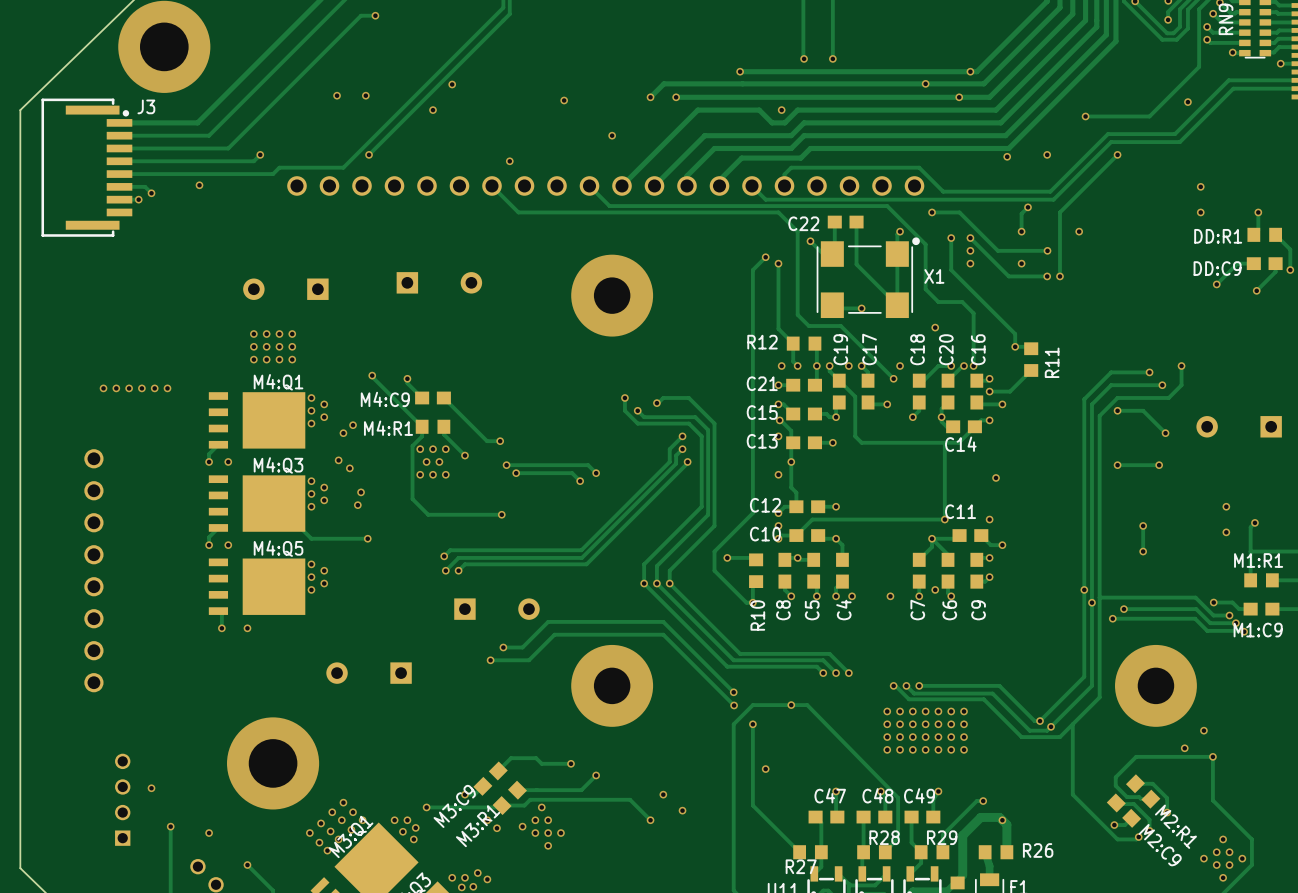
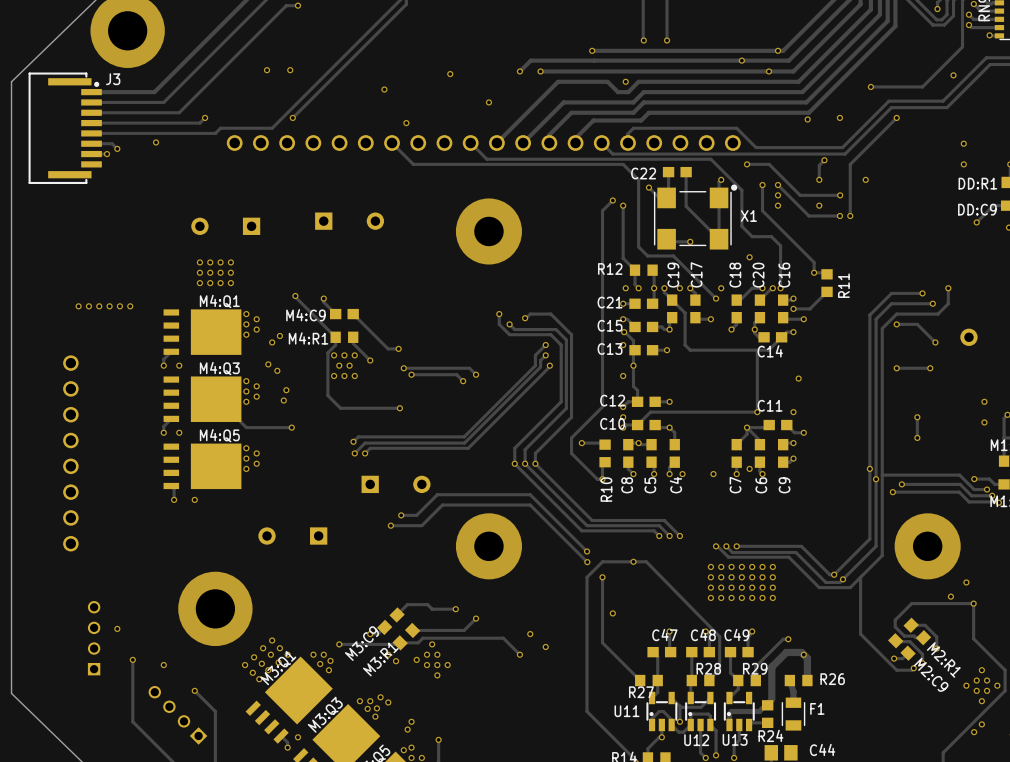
via: (452, 84) -> none
via: (433, 110) -> none
via: none -> (384, 89)

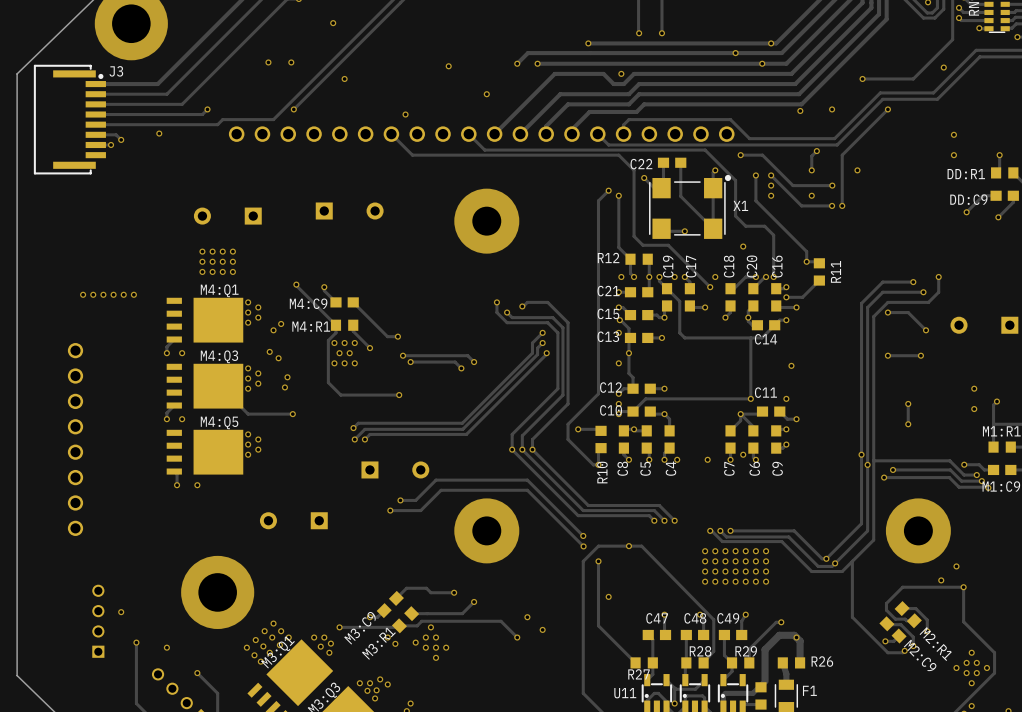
via: none -> (333, 23)
via: none -> (344, 78)
via: (384, 89) -> none

